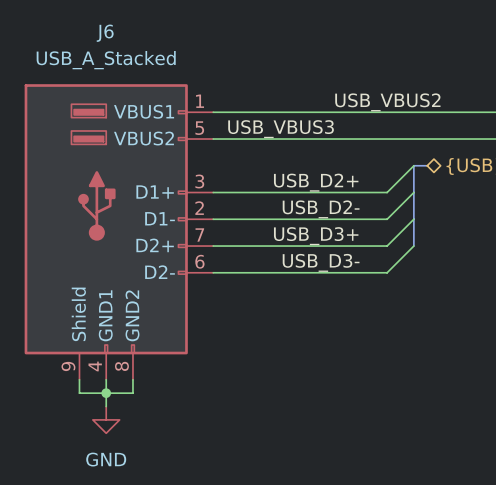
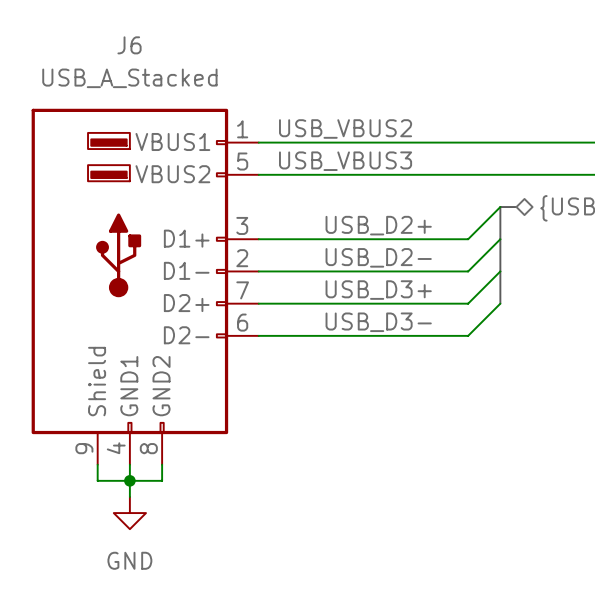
label position: USB_VBUS2 (387, 102) -> USB_VBUS2 (345, 128)

